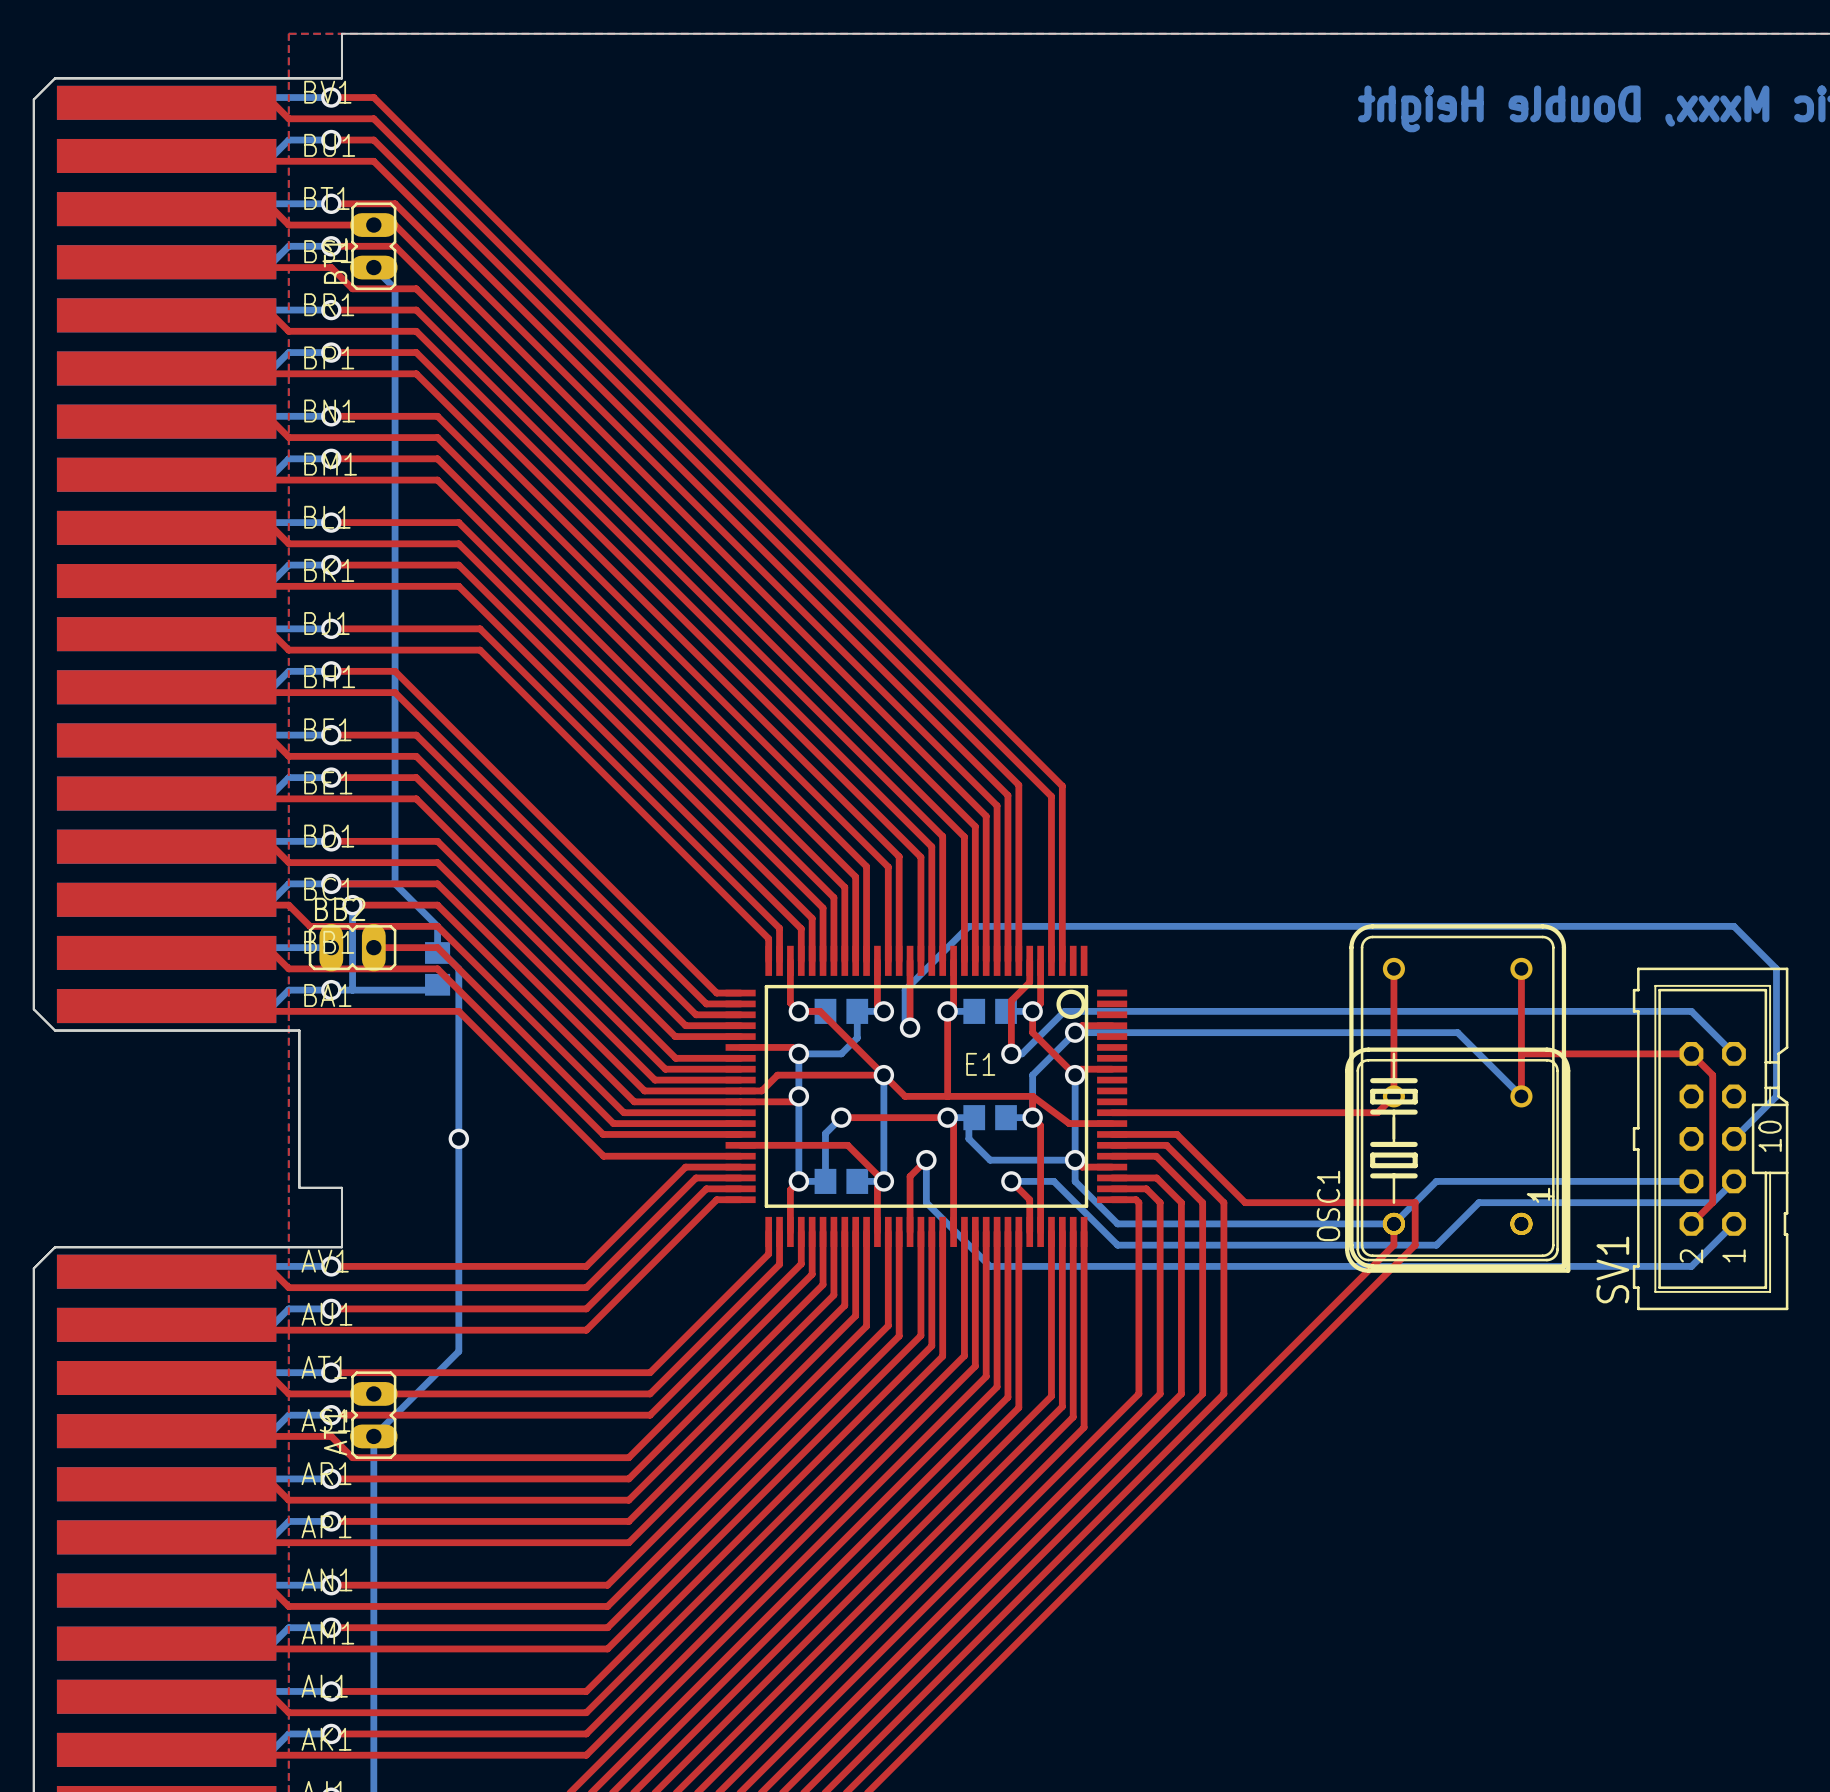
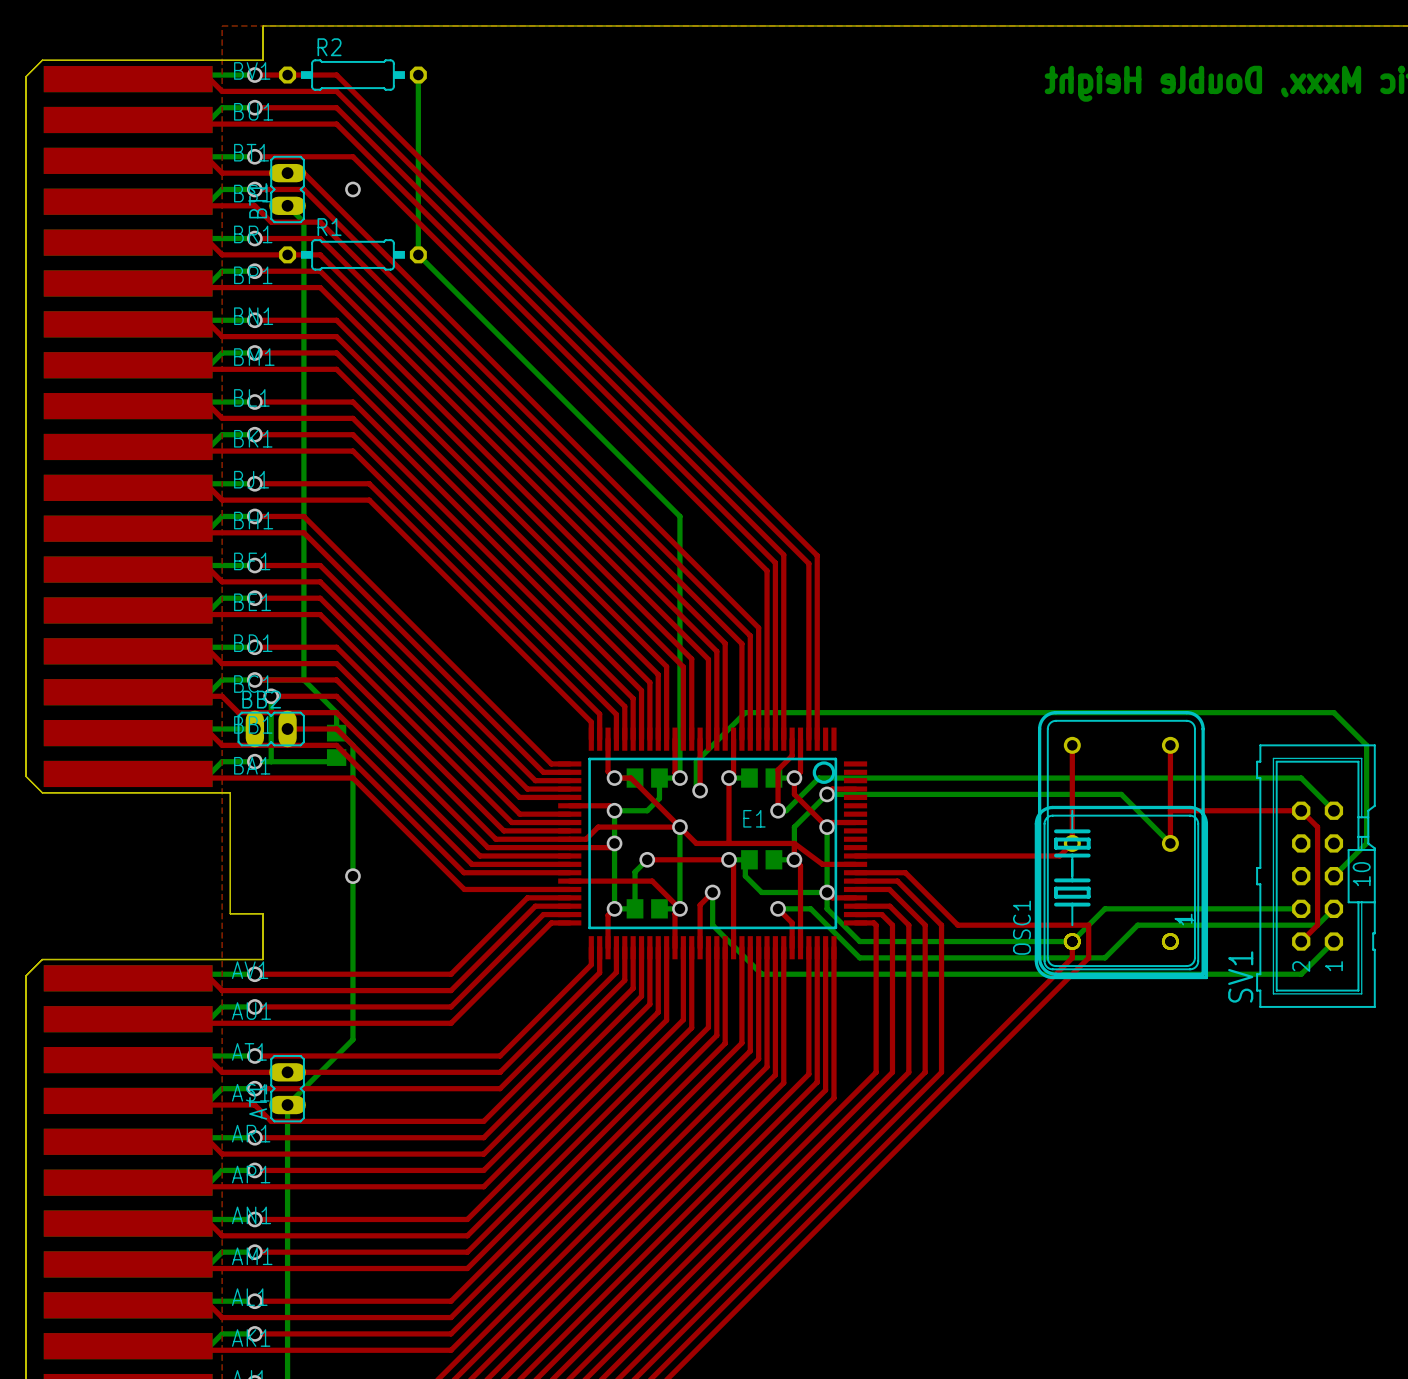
top track: (373, 97) (437, 161) -> (287, 124) (336, 124)
top track: none -> (287, 75) (336, 75) (817, 555) (817, 604)
R2: none -> (352, 75)
bottom track: none -> (418, 75) (418, 254) (679, 516) (679, 778)
top track: (373, 118) (458, 203) -> (303, 156) (352, 156)
top track: none -> (287, 91) (336, 91) (808, 563) (808, 612)
top track: (373, 140) (1018, 785) -> (287, 107) (336, 107) (783, 554) (783, 603)
top track: (373, 161) (1007, 795) -> none
top track: (395, 203) (997, 805) -> none
via: none -> (352, 189)
R1: none -> (352, 254)
top track: (1007, 731) (1062, 786) -> (775, 562) (775, 611)
top track: (997, 742) (1051, 796) -> (767, 570) (767, 619)

